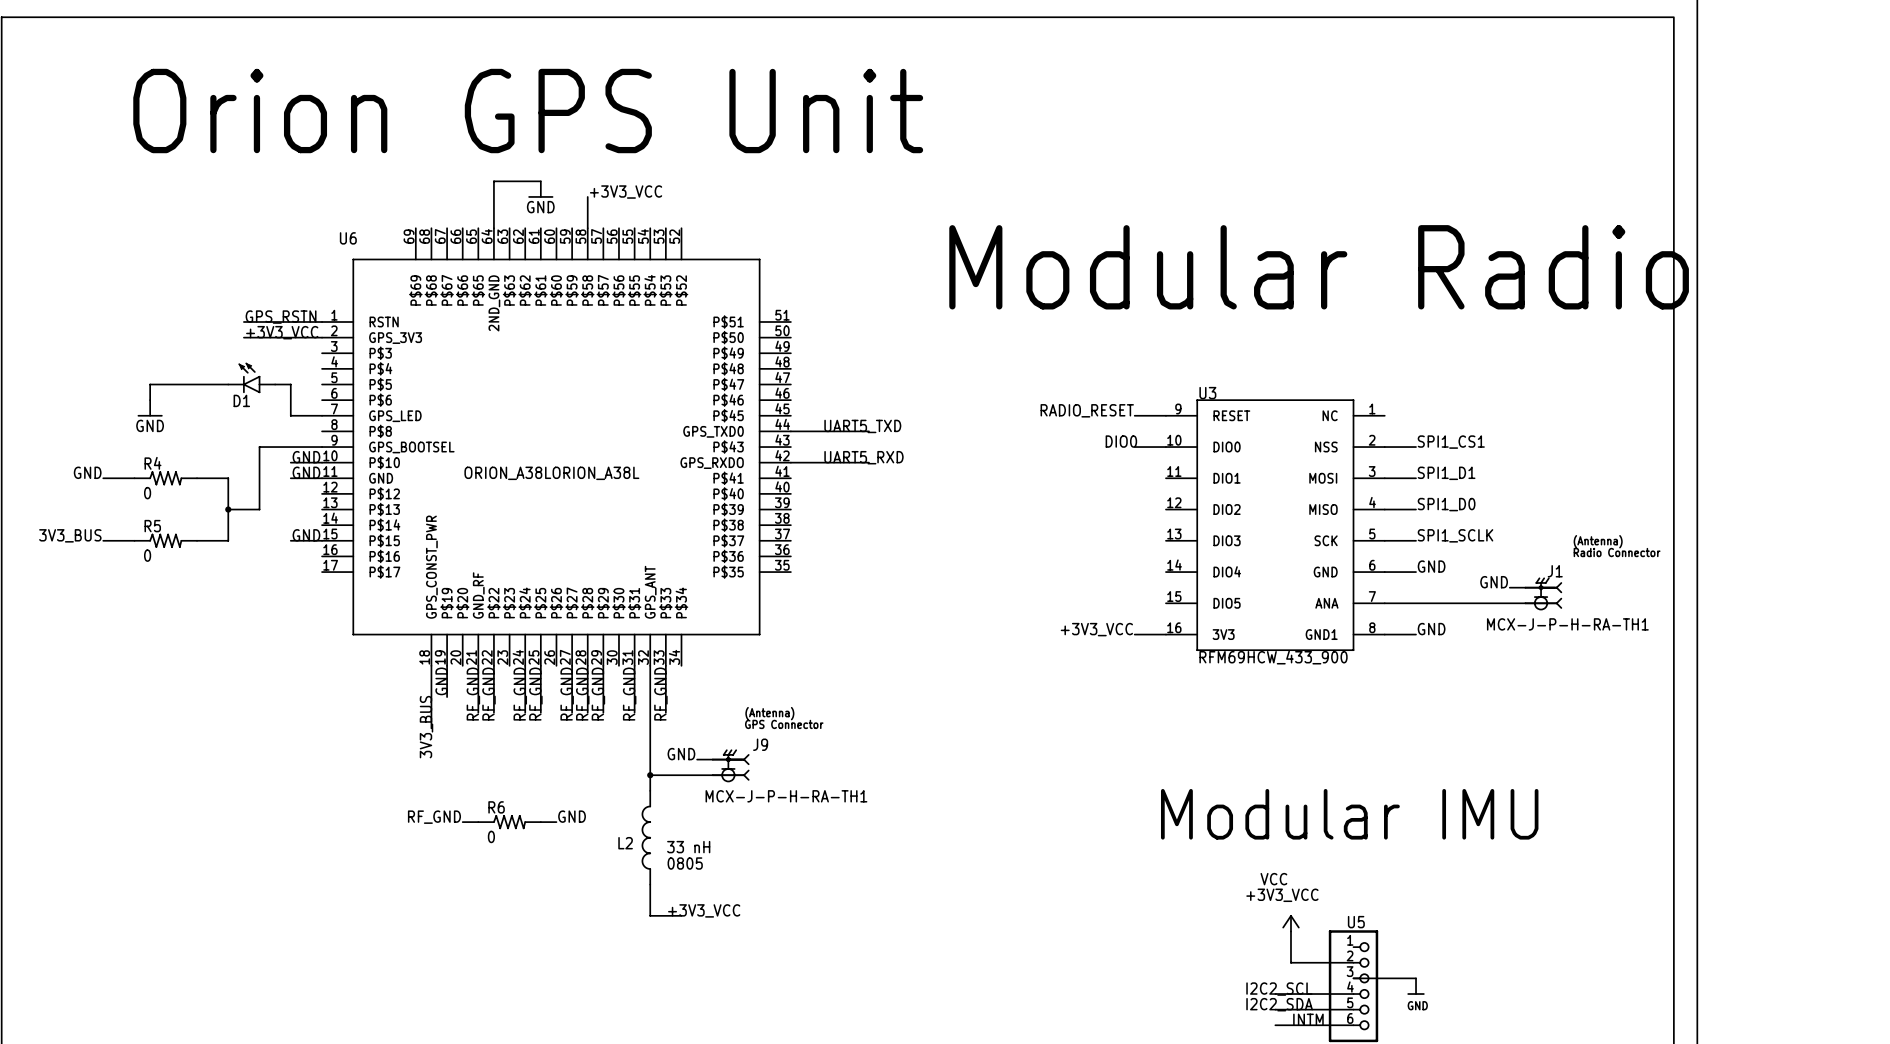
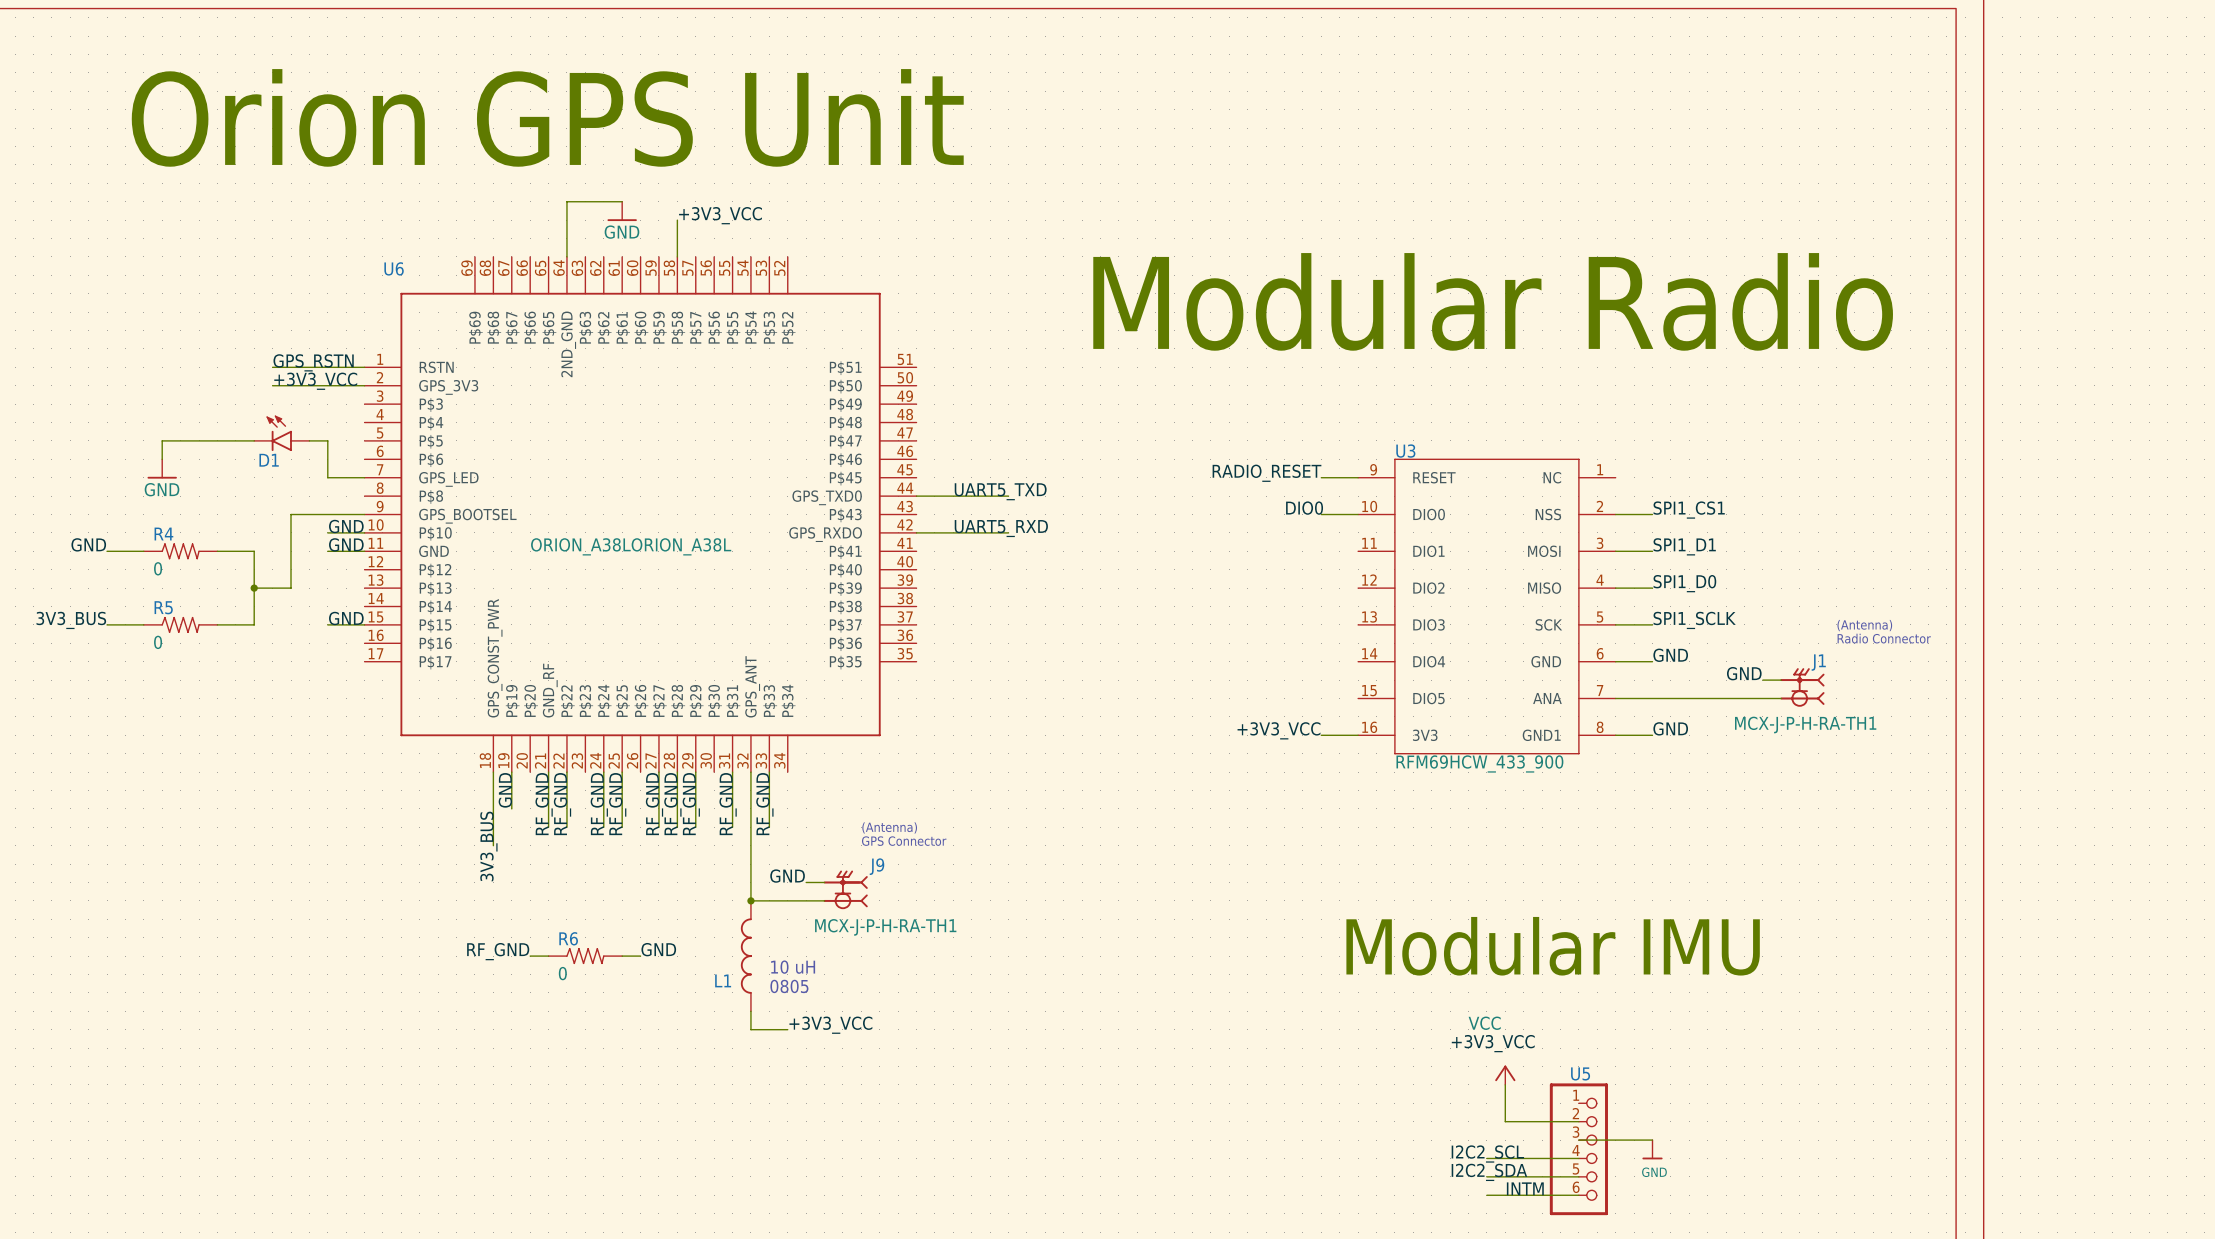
L1: none -> (746, 956)
text: none -> 10 uH (793, 967)
L2: (646, 837) -> none
text: 33 nH (688, 847) -> 0805 (789, 986)
text: 0805 (685, 863) -> none
wire: none -> (750, 1011) (750, 1029) (787, 1029)
wire: (650, 884) (650, 915) (681, 915) -> none
label position: +3V3_VCC (704, 910) -> +3V3_VCC (830, 1025)

